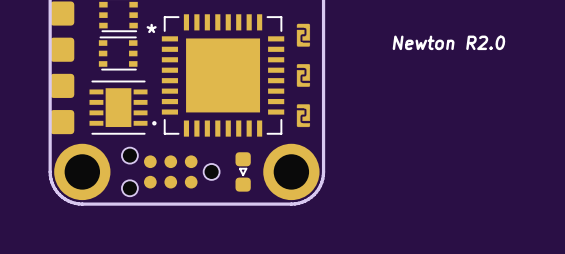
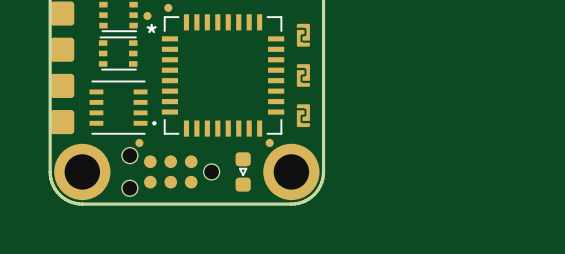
part: none -> (168, 7)
part footprint: [161, 14, 285, 137] -> [161, 14, 285, 137]
part: none -> (147, 15)
text: Newton R2.0 (448, 42) -> none
part footprint: [89, 80, 157, 135] -> [89, 80, 157, 135]
part: none -> (139, 142)
part: none -> (269, 142)

